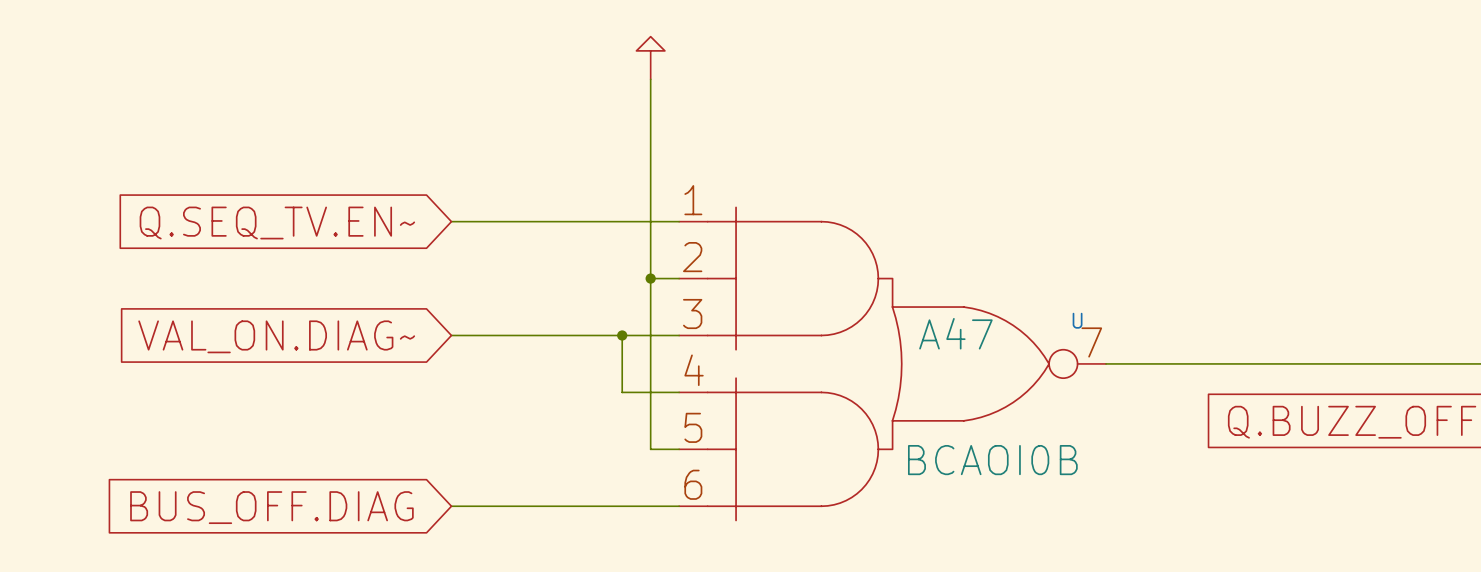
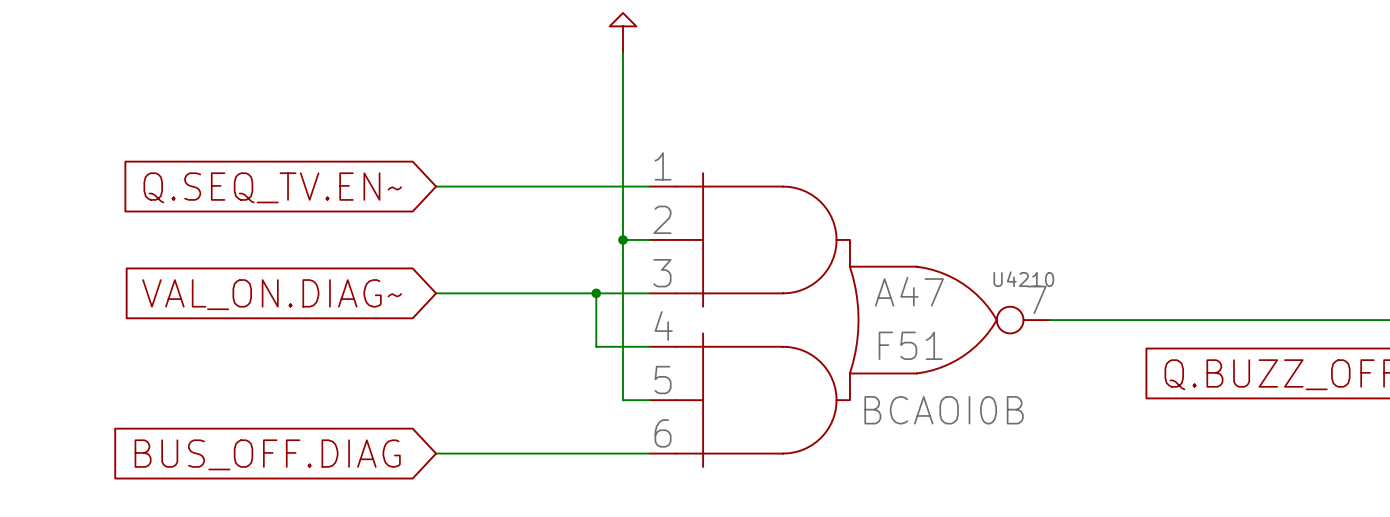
U name: U (1077, 320) -> U4210 (1023, 279)
U value: none -> F51 (910, 345)

